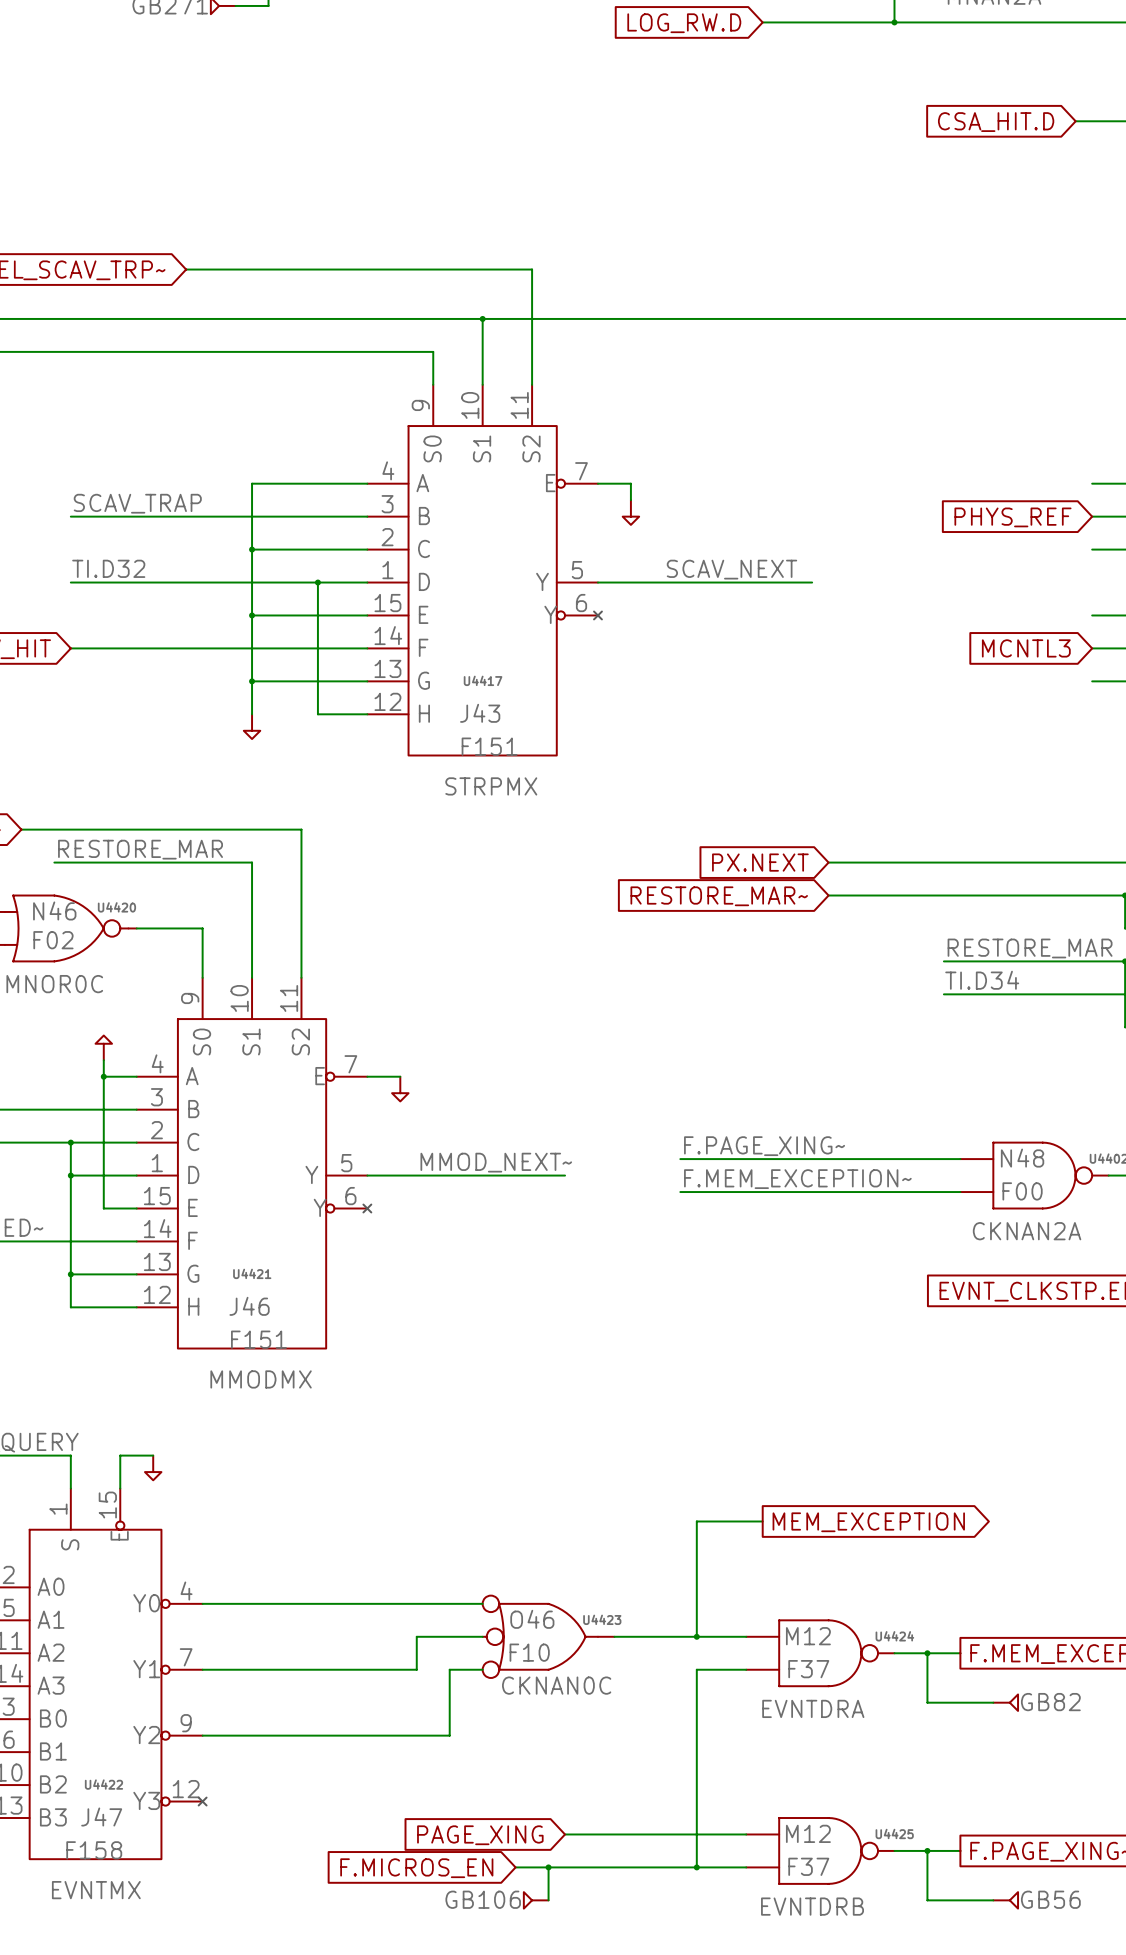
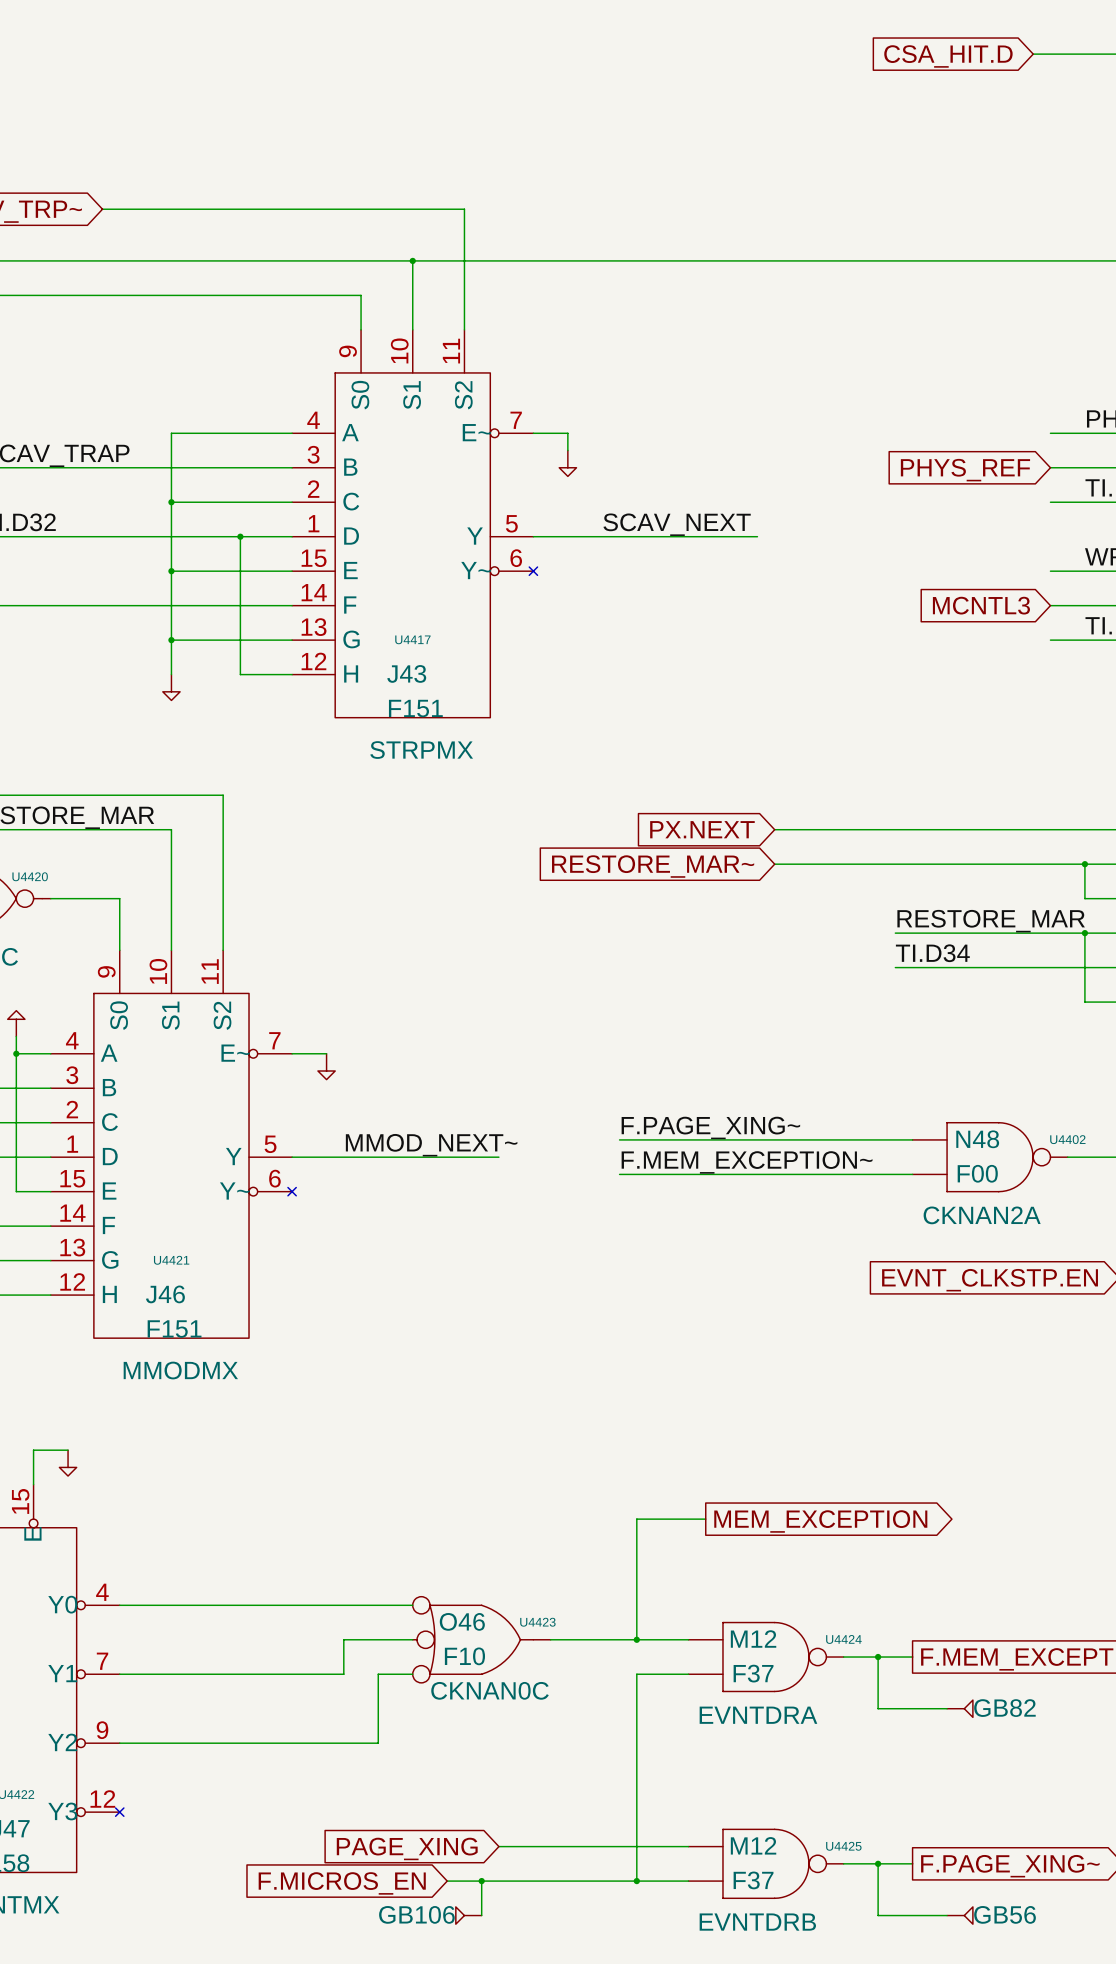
U4417 pin name: E (550, 483) -> E~ (476, 432)
U4417 pin name: Y (550, 614) -> Y~ (476, 570)
U4421 pin name: E (320, 1076) -> E~ (235, 1053)
U4421 pin name: Y (320, 1207) -> Y~ (234, 1191)

